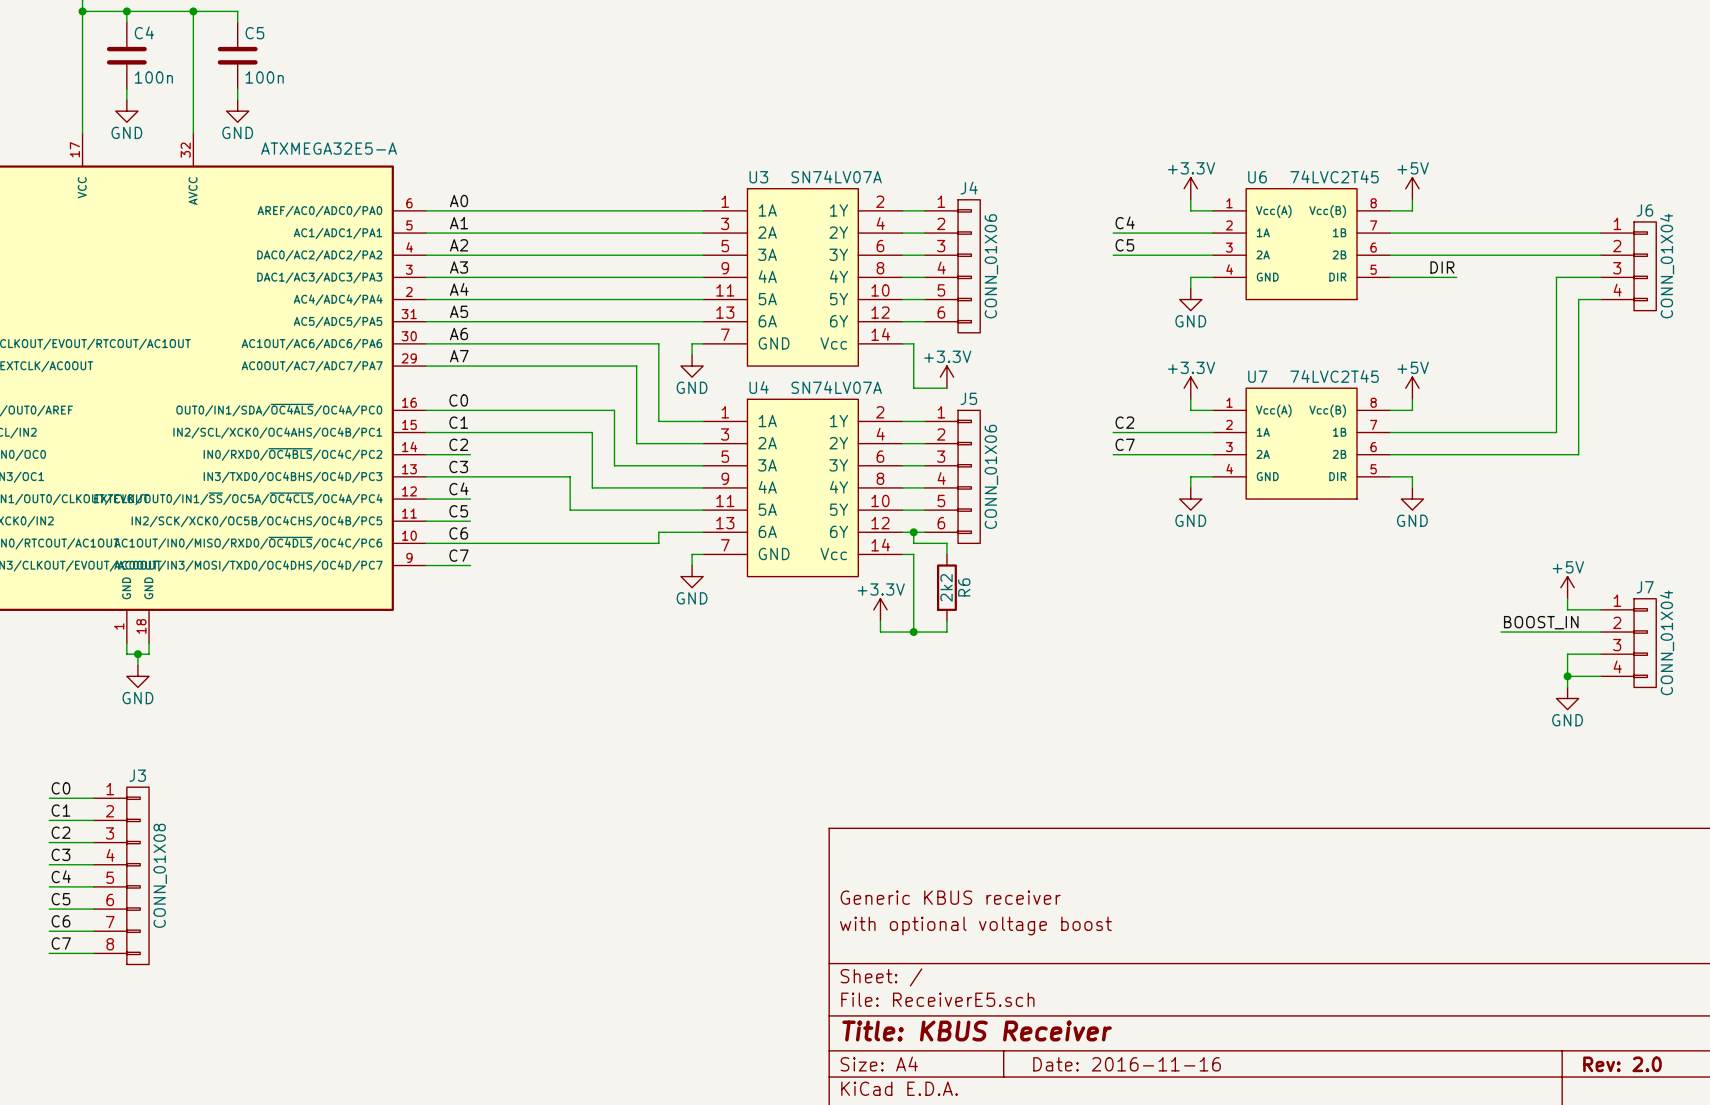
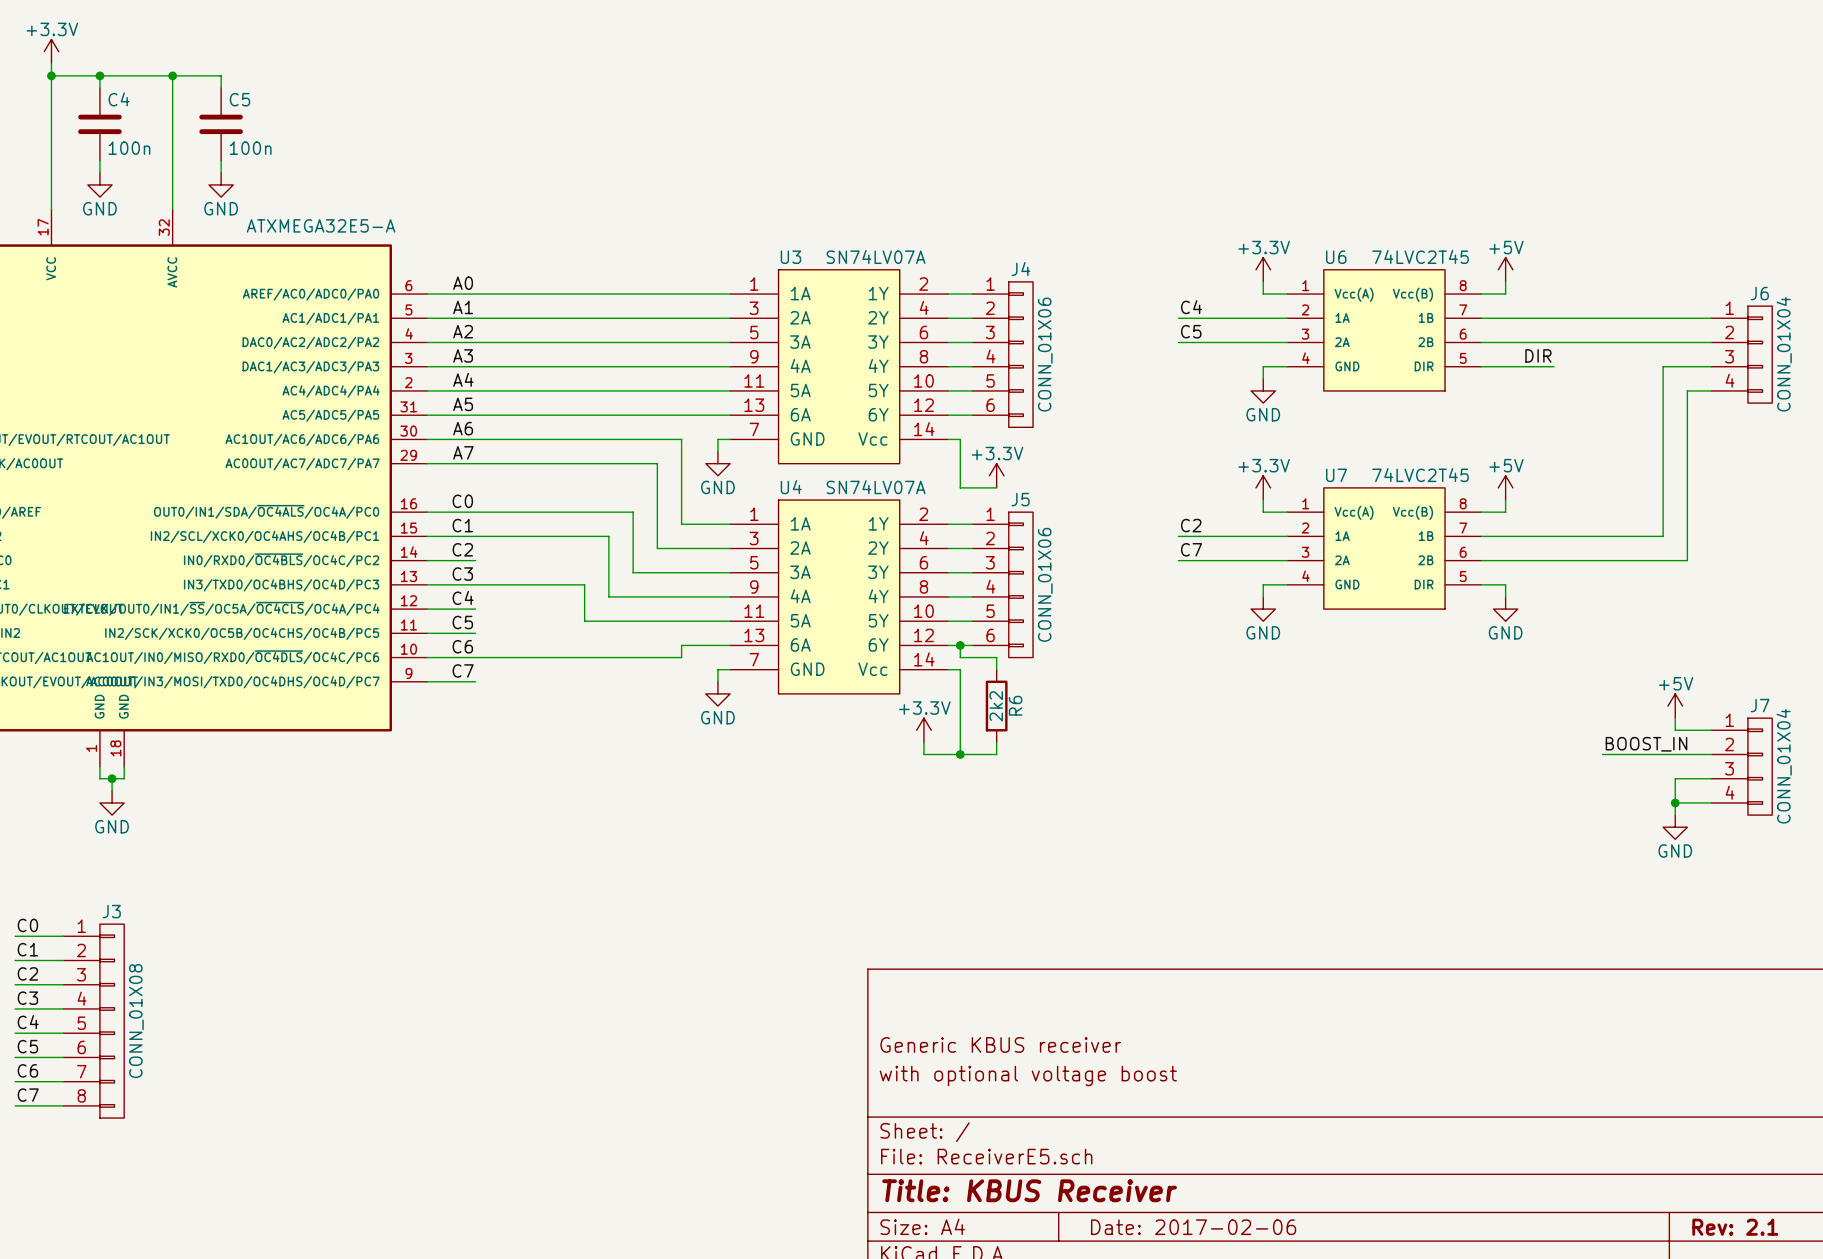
title block: Date: 2016-11-16 (1127, 1064) -> Date: 2017-02-06 (1193, 1227)
title block: Rev: 2.0 (1622, 1064) -> Rev: 2.1 (1735, 1227)

